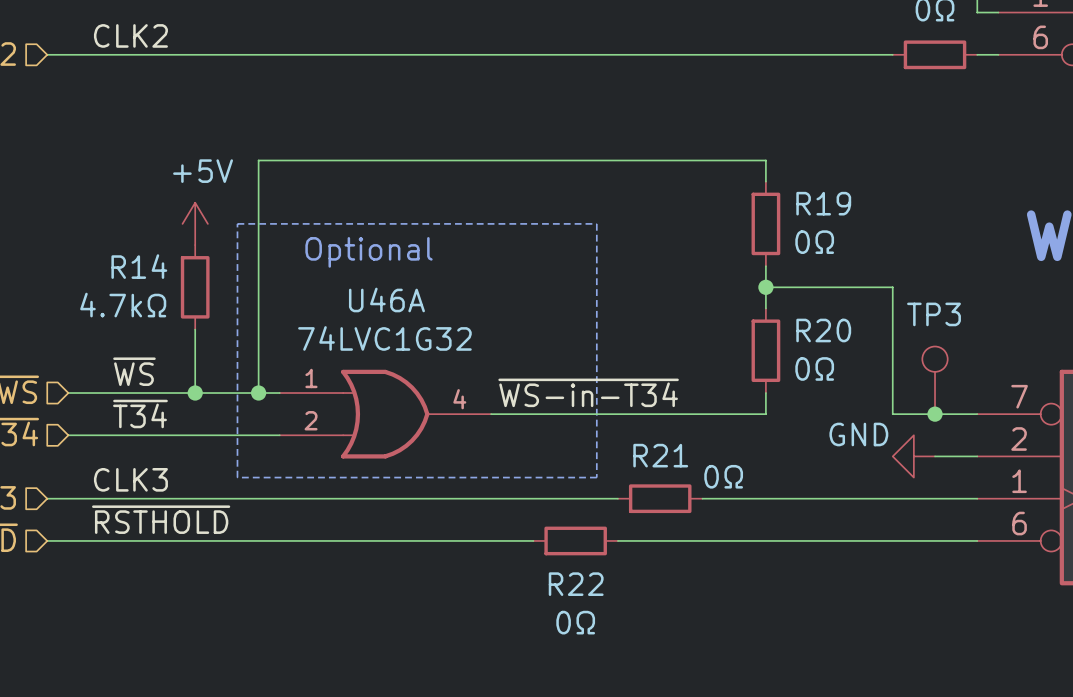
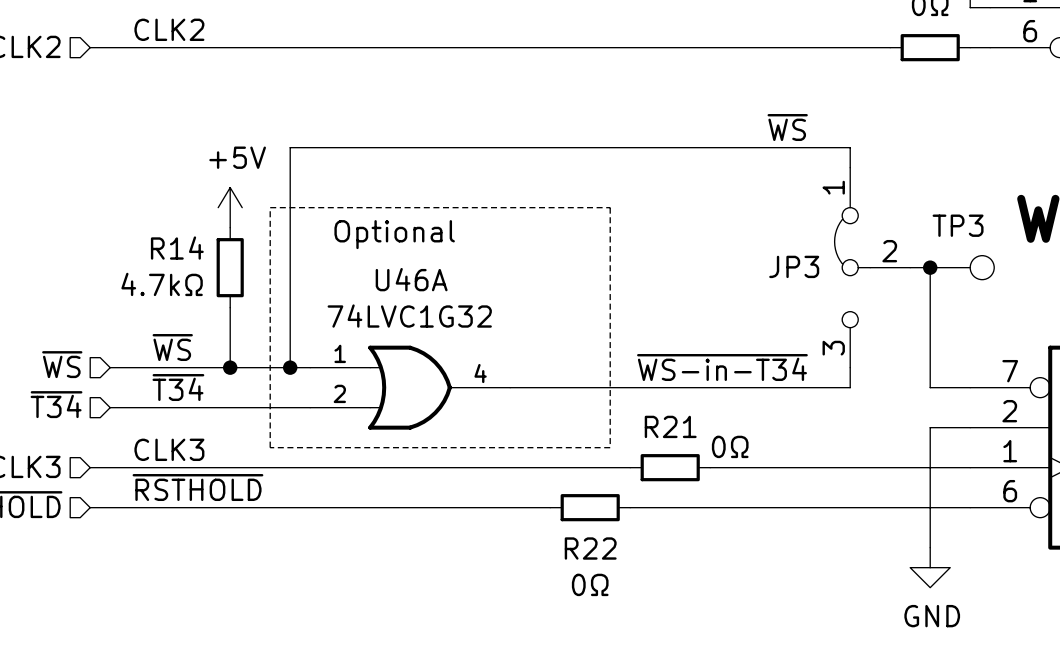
label: none -> ~{WS} (787, 127)
wire: (765, 160) (765, 181) -> (770, 147) (850, 147) (850, 167)
R19: 0Ω (765, 223) -> none
wire: (765, 266) (765, 308) -> none
wire: (765, 287) (892, 287) (892, 414) (935, 414) -> (910, 267) (930, 267) (930, 387)
junction: (765, 287) -> none
JP3: none -> (872, 267)
junction: none -> (930, 267)
R20: 0Ω (765, 350) -> none
TP3 rotation: 0° (935, 359) -> 90° clockwise (982, 267)
TP3 position: (935, 380) -> (962, 267)
label position: ~{WS-in-T34} (588, 392) -> ~{WS-in-T34} (722, 367)
wire: (765, 393) (765, 414) -> (850, 367) (850, 387) (770, 387)
junction: (935, 414) -> none
power symbol rotation: 0° (913, 456) -> 90° counterclockwise (930, 567)
power symbol position: GND (913, 456) -> GND (930, 567)
wire: none -> (930, 427) (930, 547)

